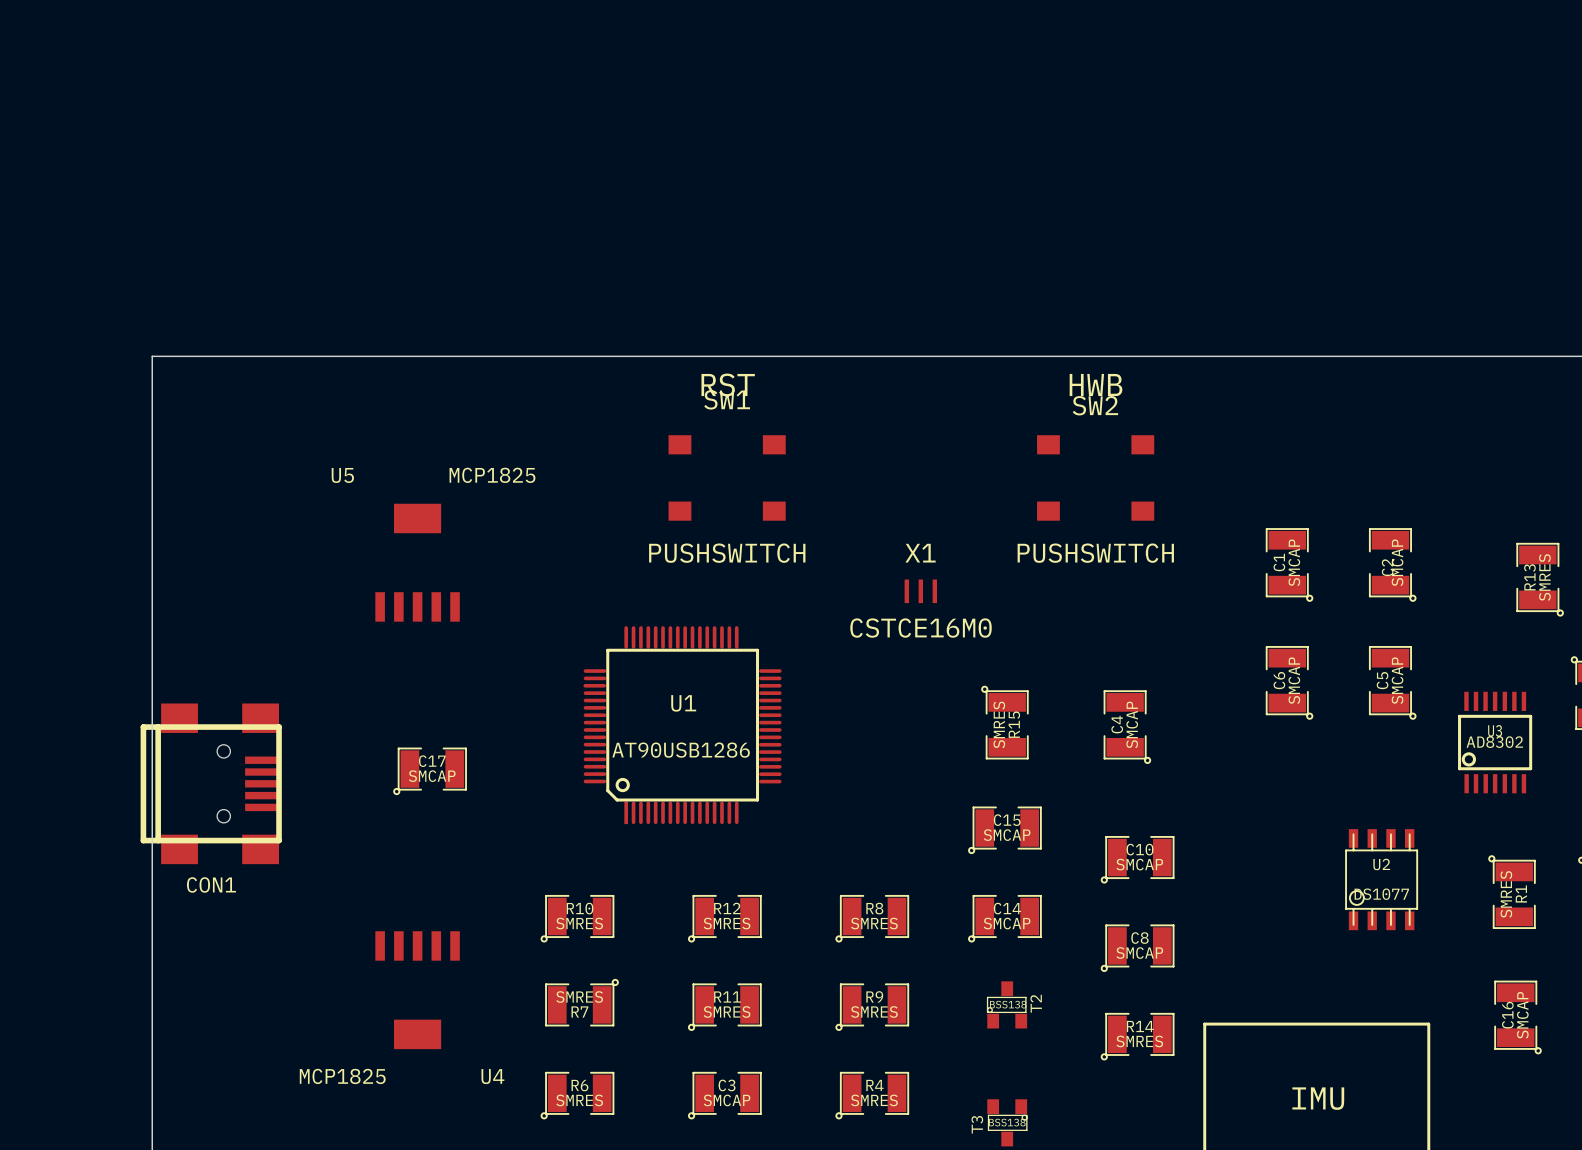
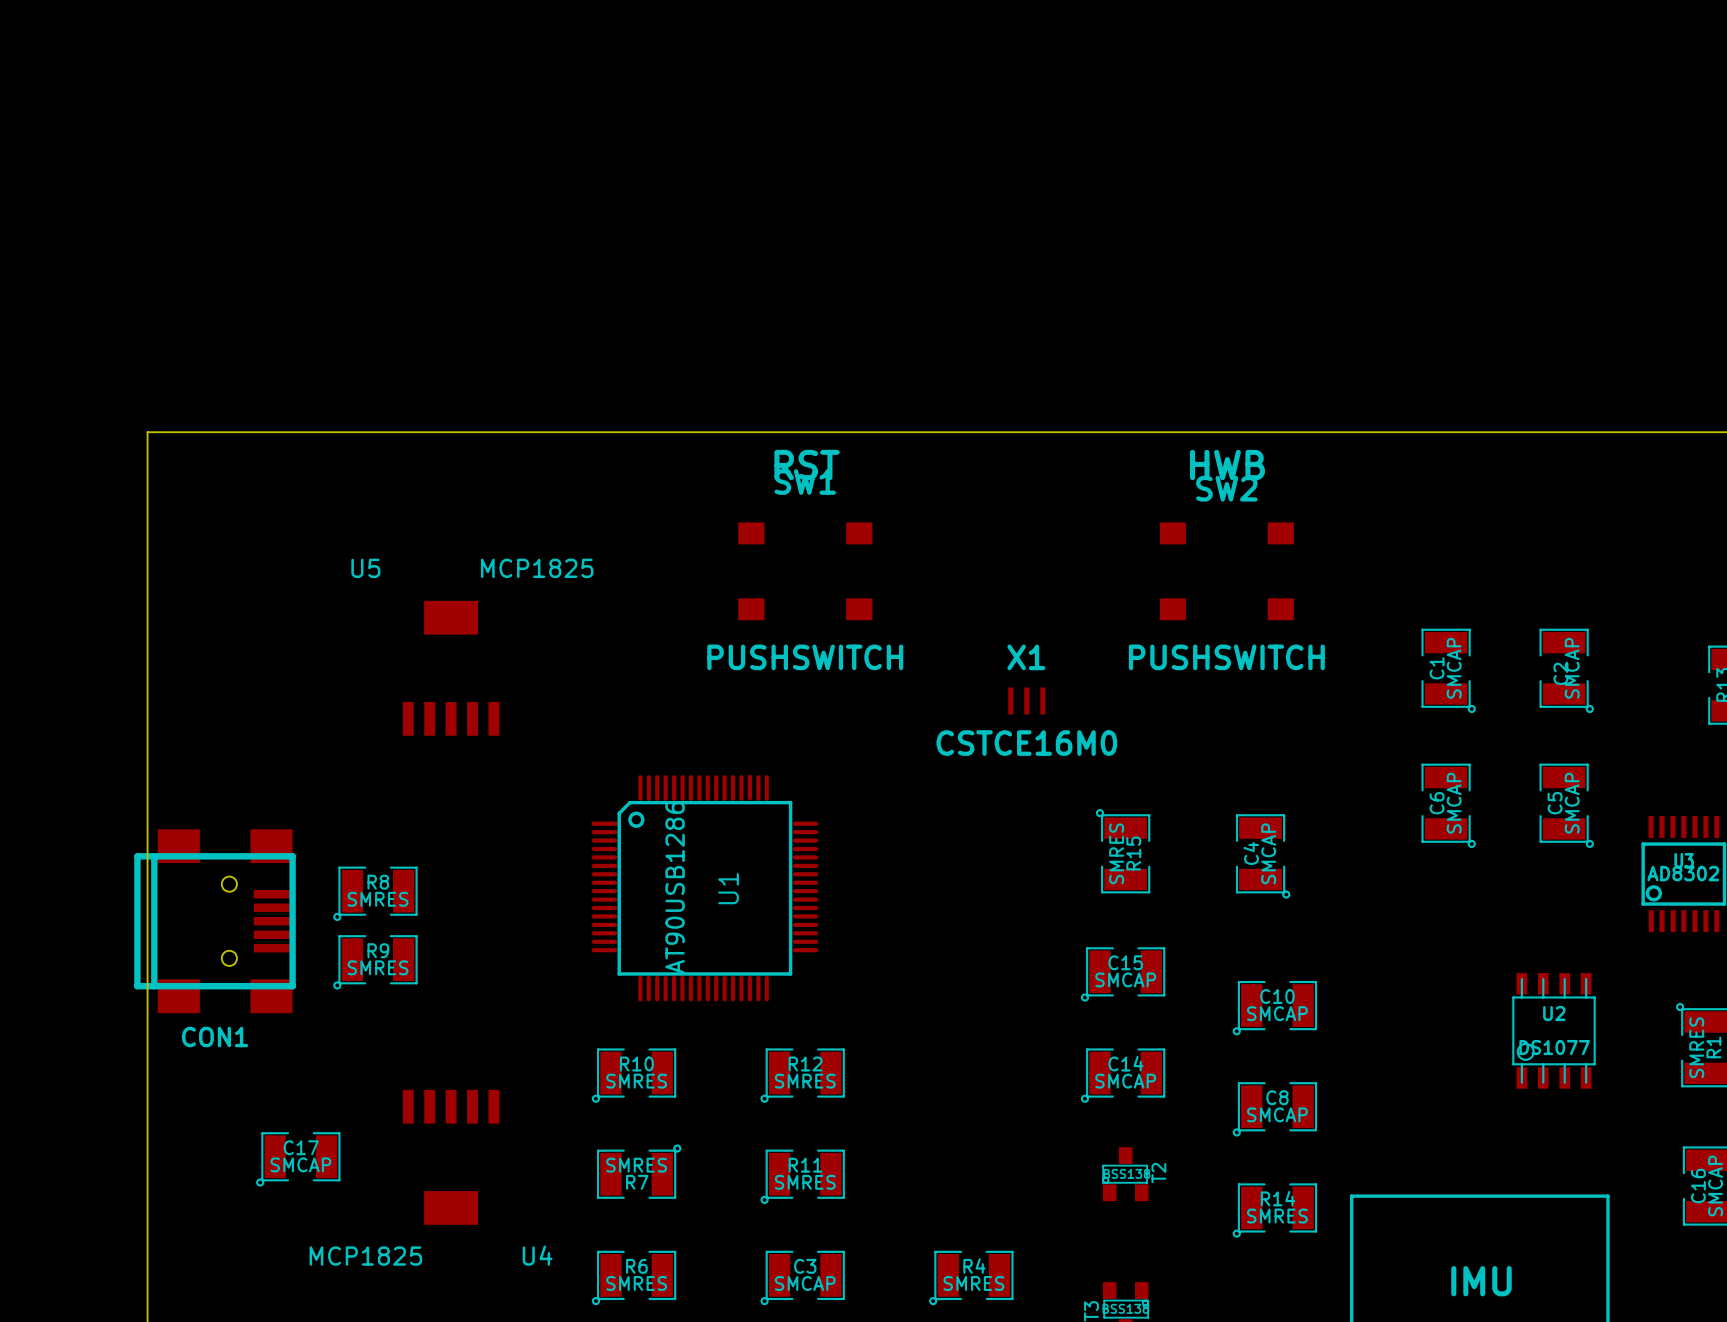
U1 rotation: 0° (682, 725) -> 90° clockwise (704, 888)
C17 position: (430, 771) -> (298, 1159)
R8 position: (872, 918) -> (375, 893)
R9 position: (872, 1007) -> (375, 962)

